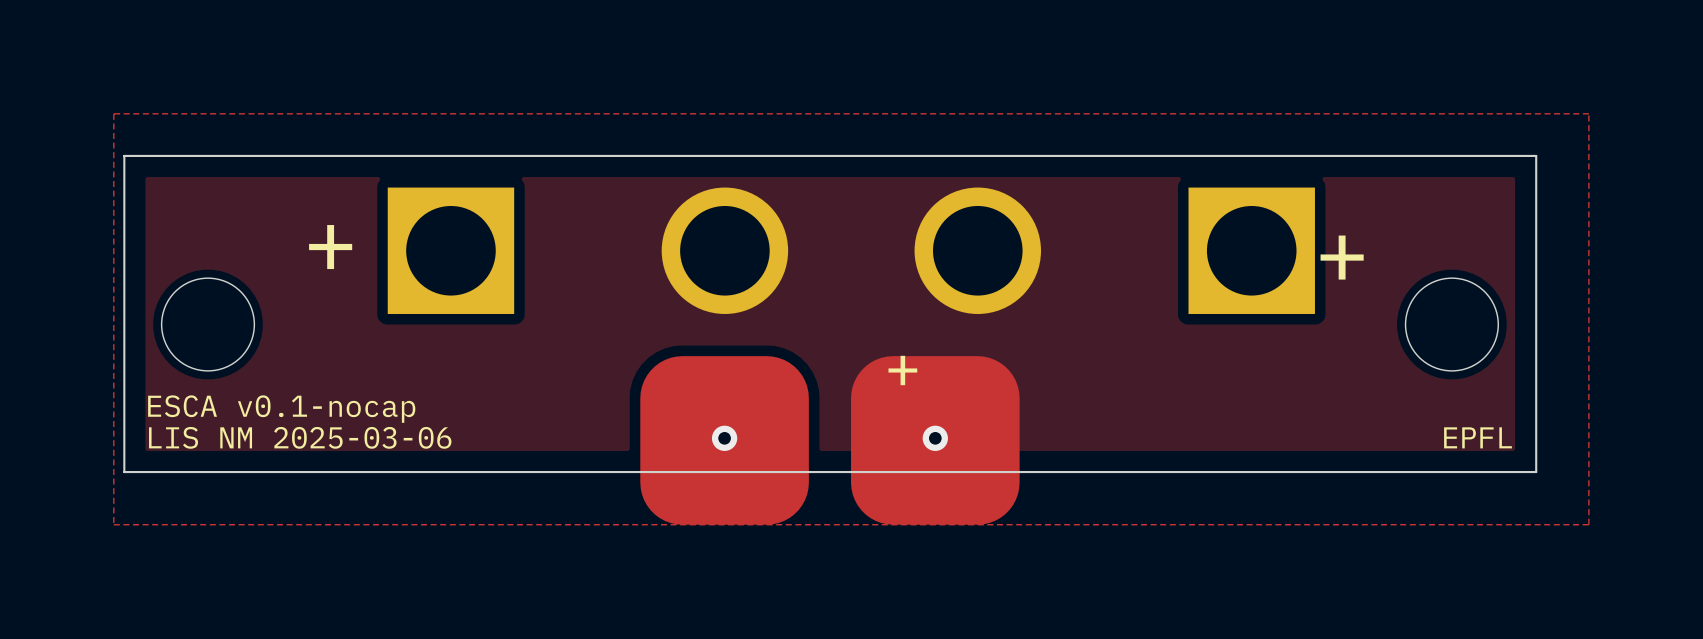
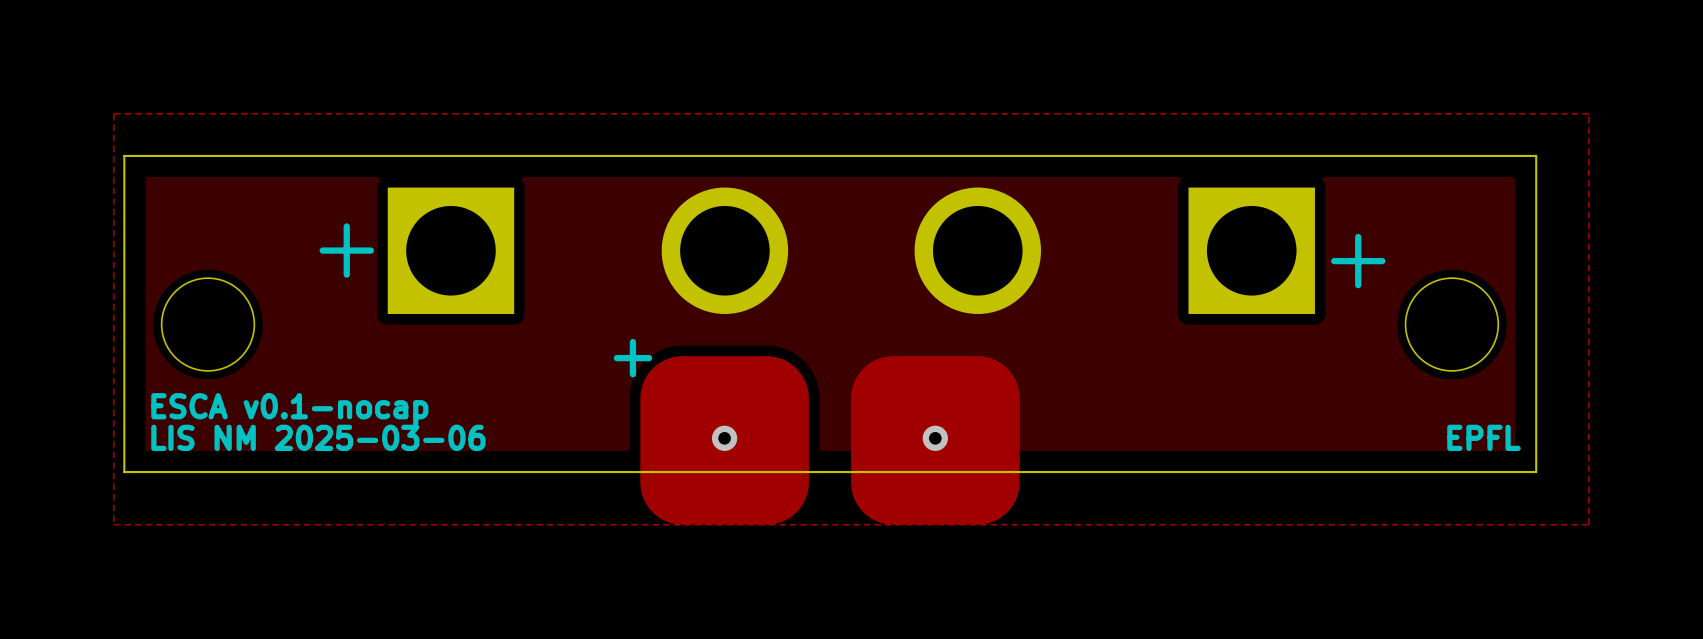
part text position: + (902, 370) -> + (632, 358)

